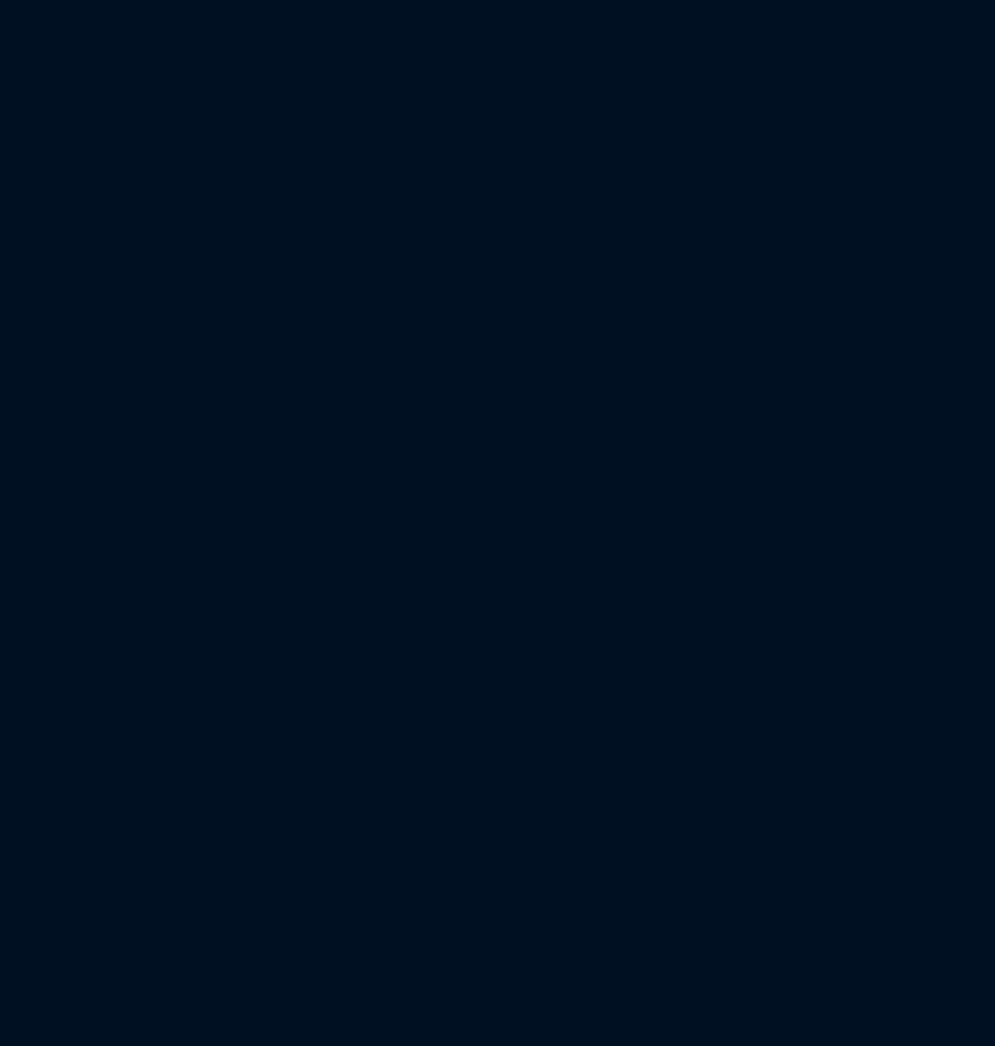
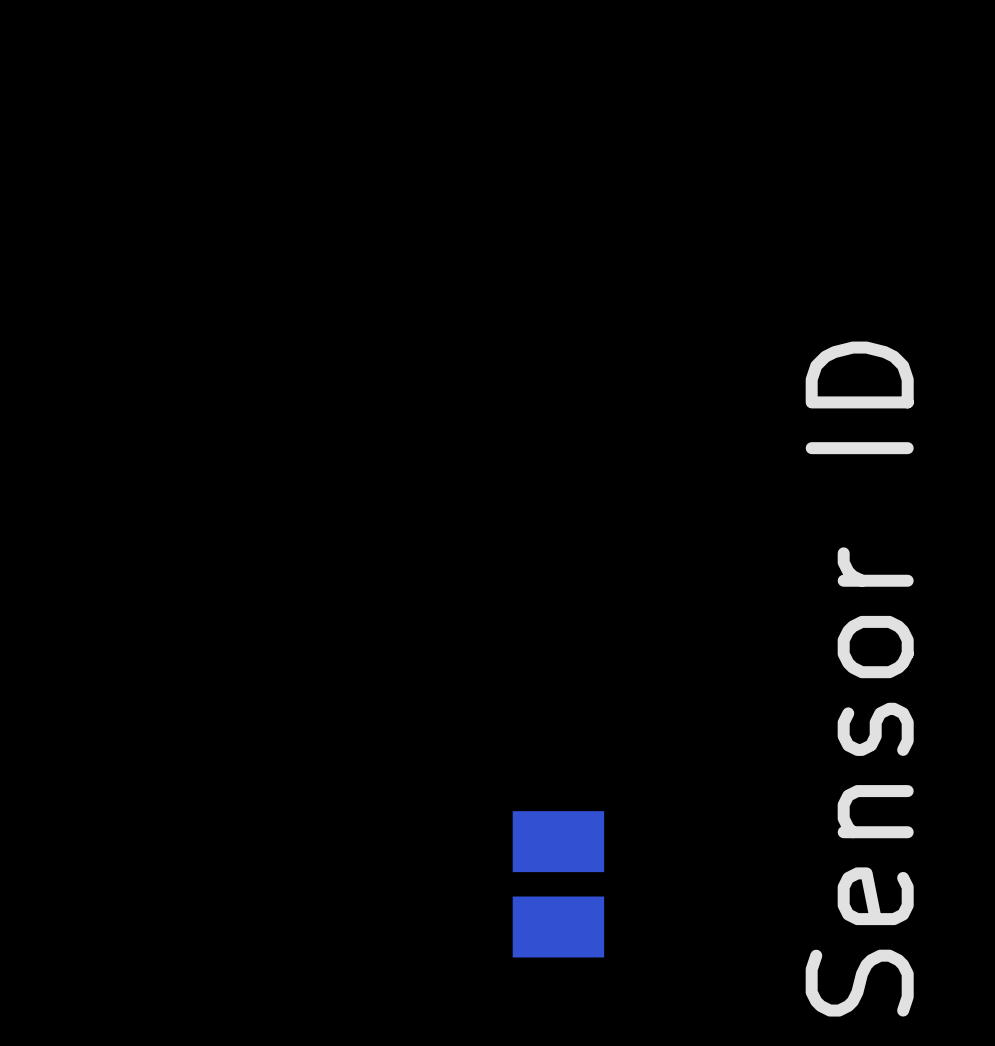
text: none -> Sensor ID (859, 679)
part: none -> (558, 884)

